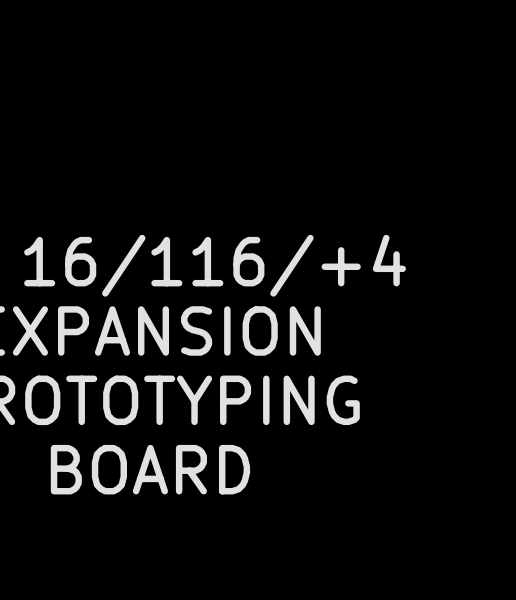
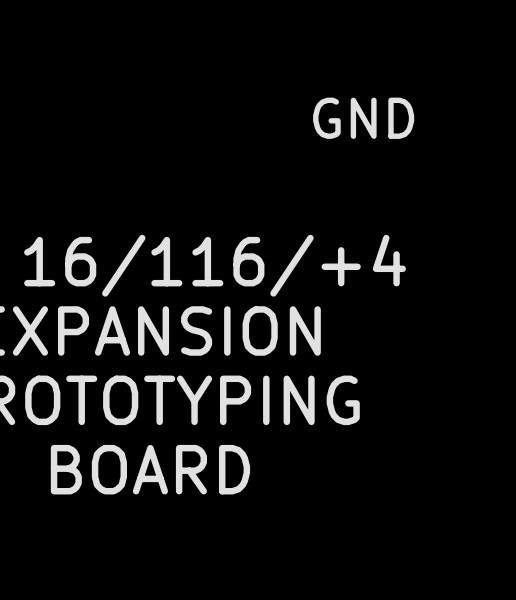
text: none -> GND (363, 118)

